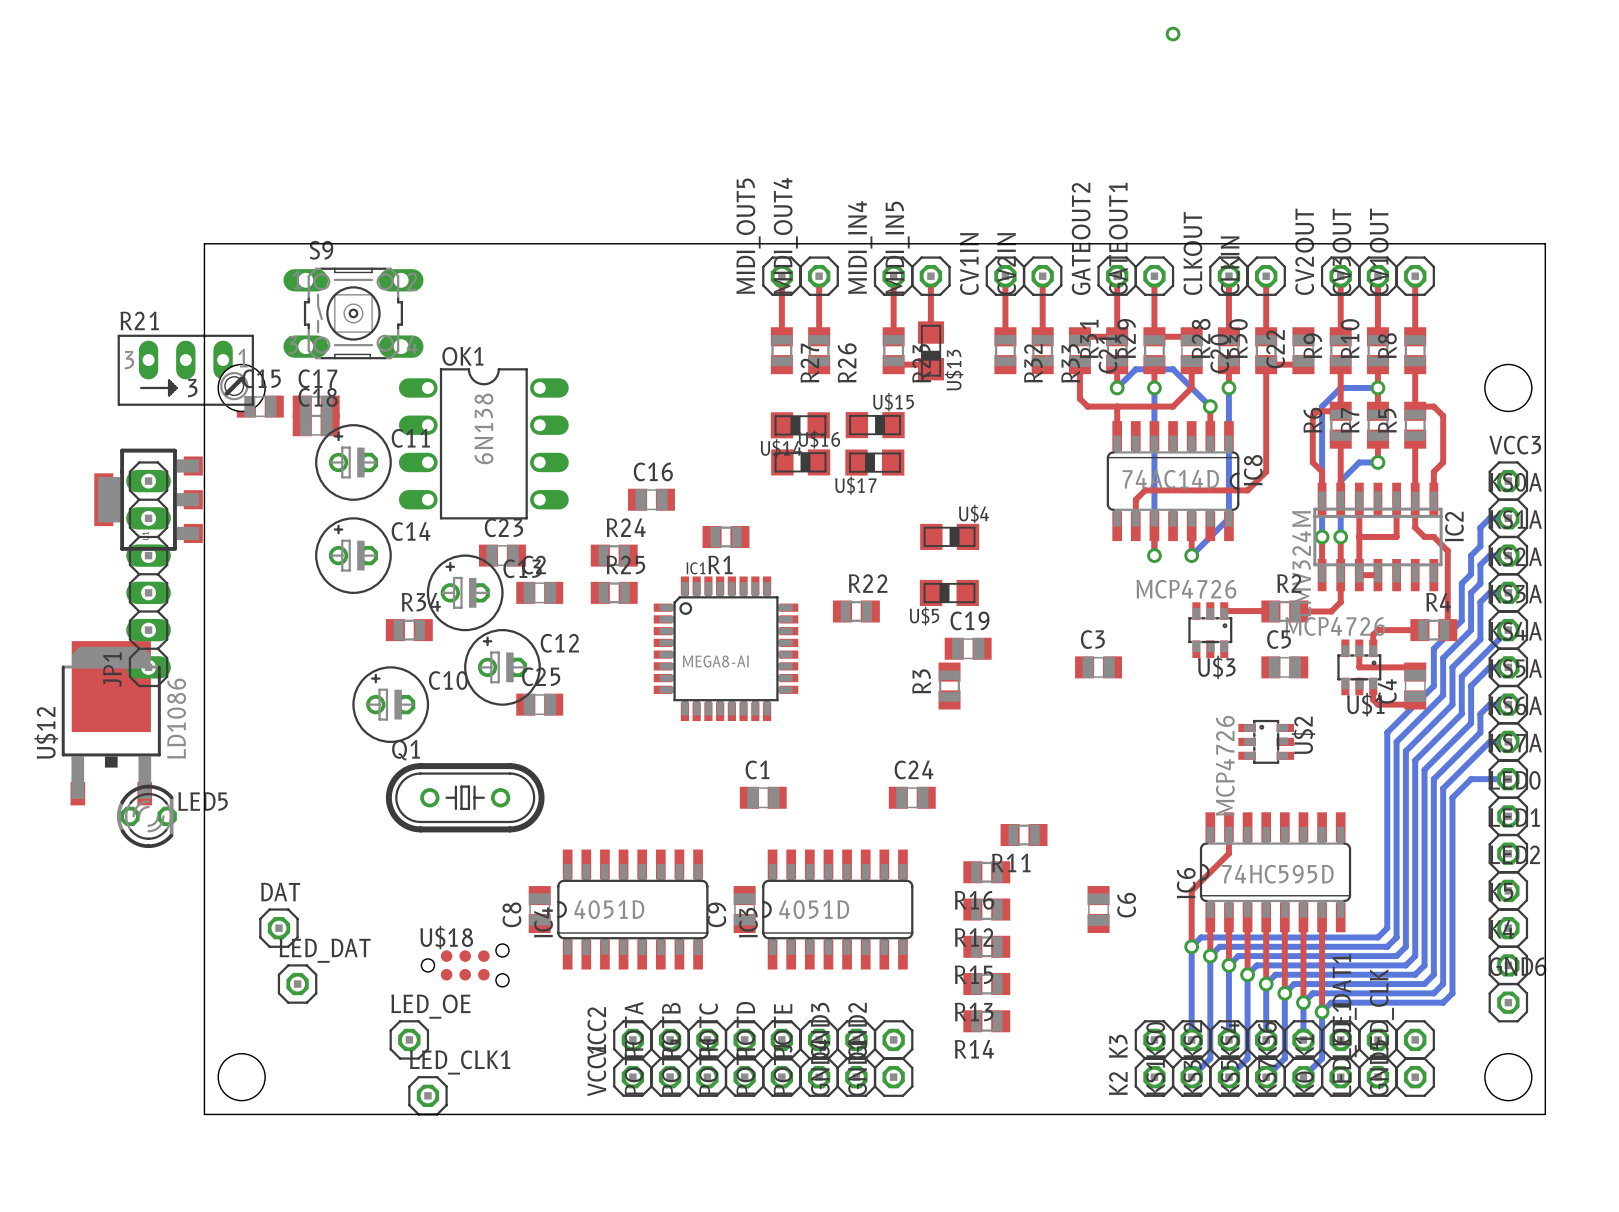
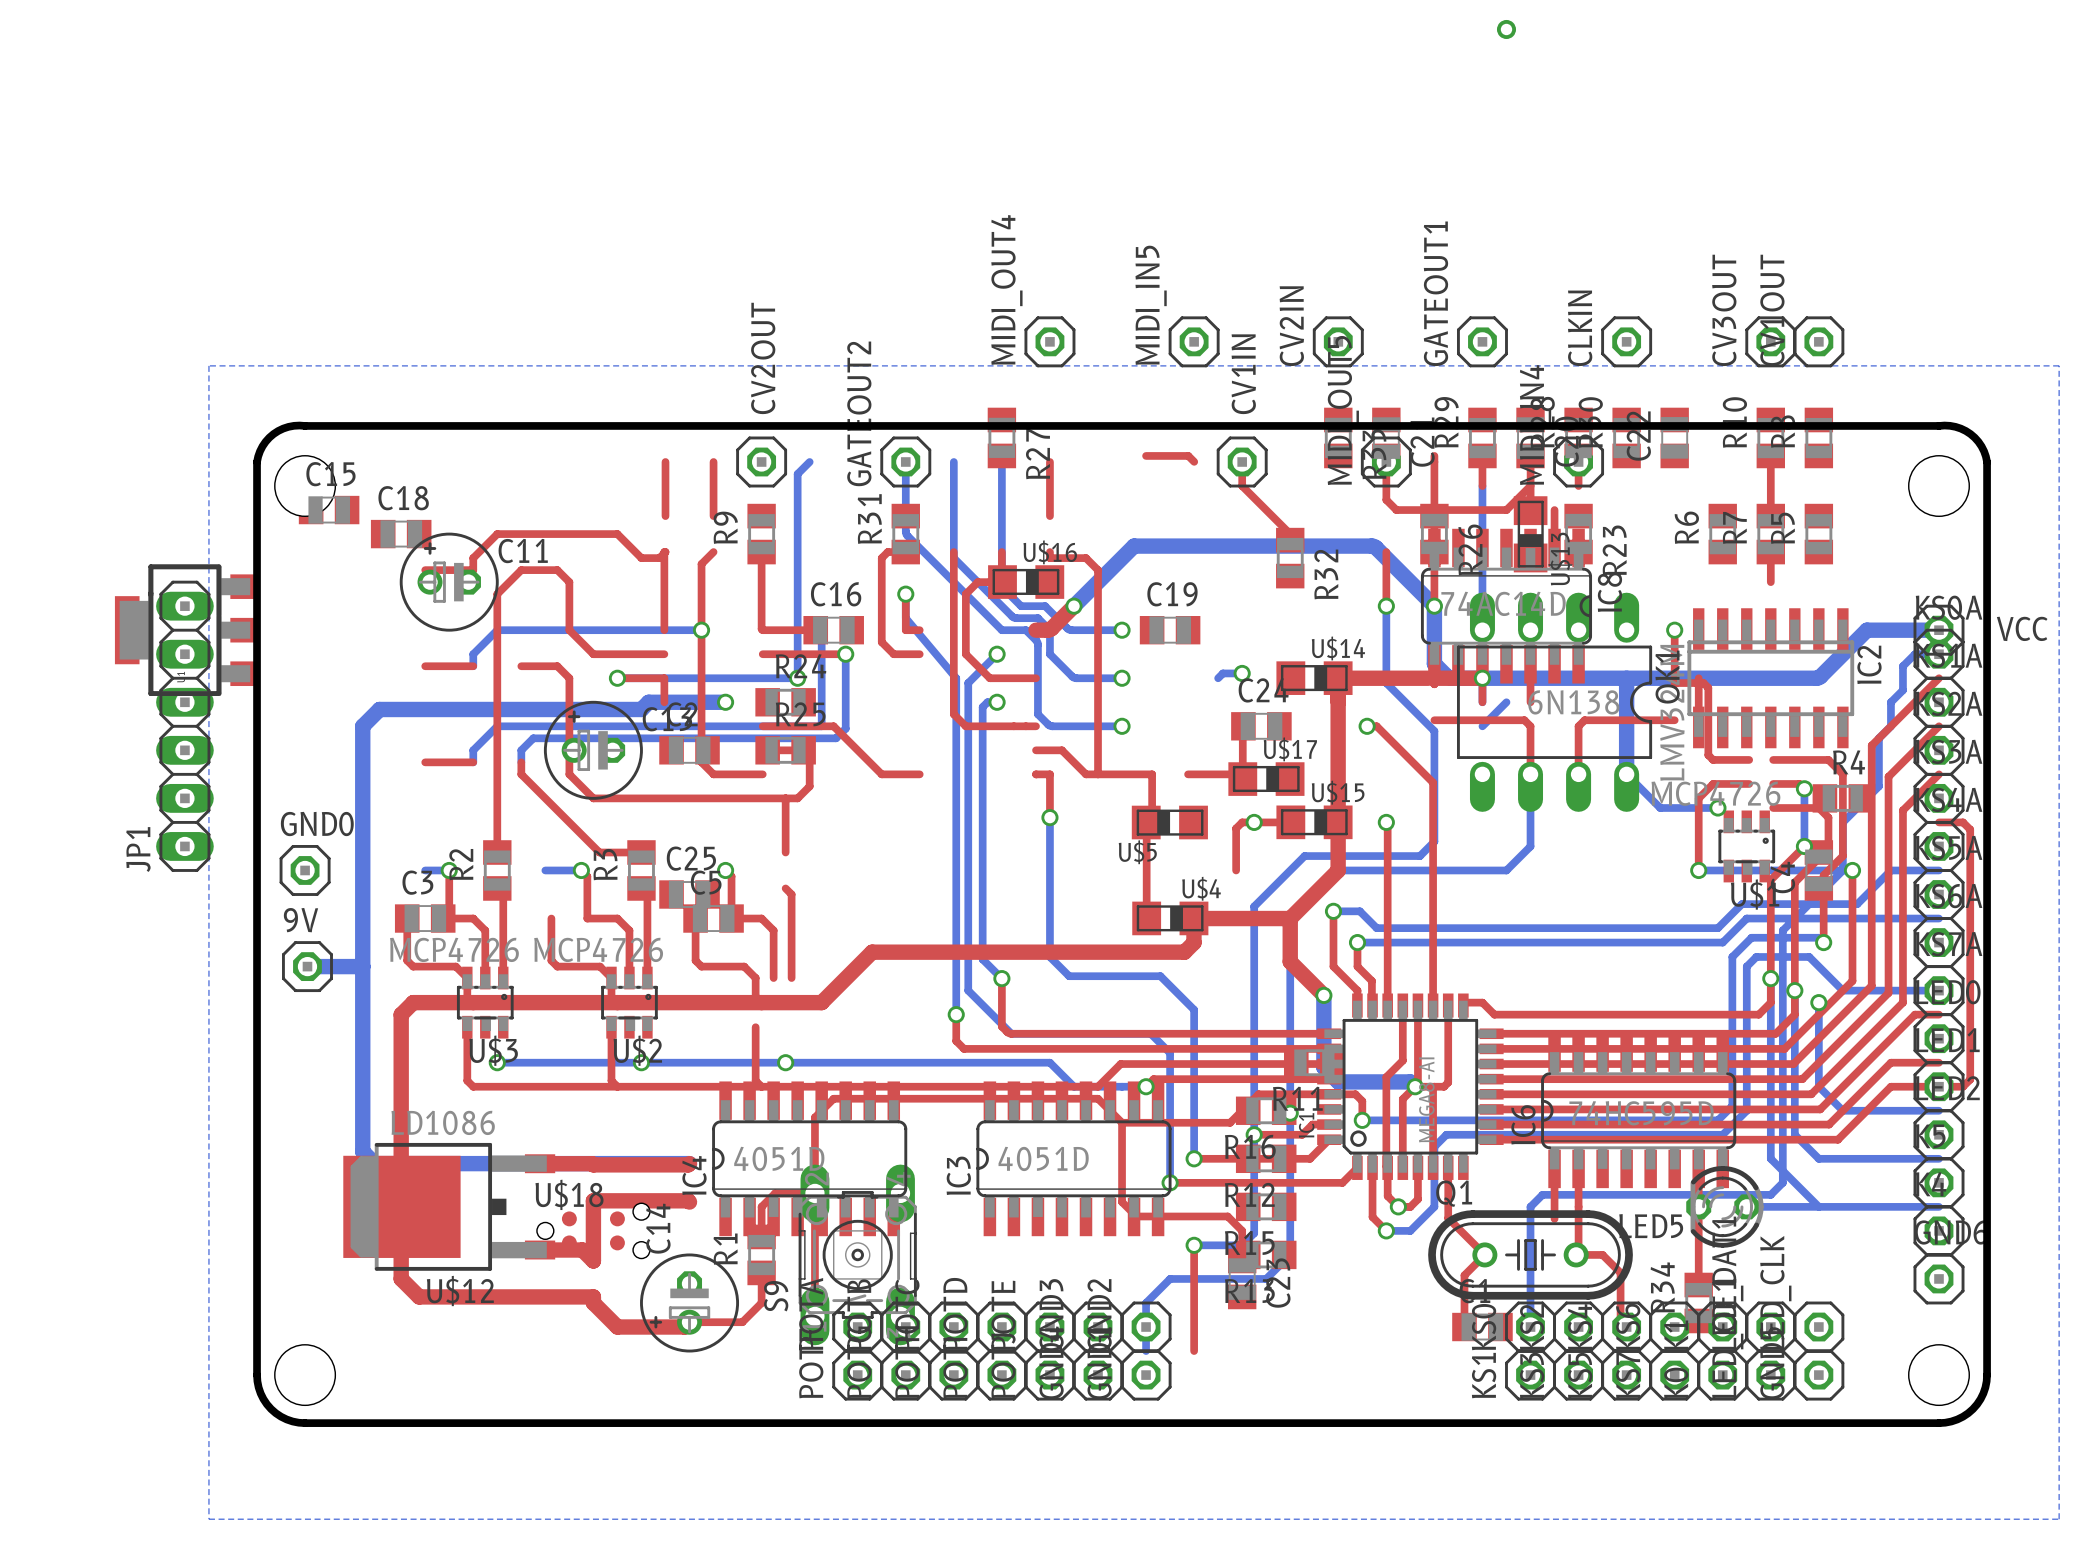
CV2OUT name position: CV2OUT (1304, 251) -> CV2OUT (763, 358)
CV1IN name position: CV1IN (969, 264) -> CV1IN (1243, 374)
top track: (781, 276) (781, 336) -> none
MIDI_OUT5 position: (781, 276) -> (1386, 461)
top track: (819, 276) (819, 336) -> none
top track: (893, 276) (893, 336) -> none
MIDI_IN4 position: (893, 276) -> (1578, 461)
top track: (930, 276) (930, 332) -> none
top track: (1005, 276) (1005, 336) -> none
CV1IN position: (1005, 276) -> (1242, 461)
top track: (1042, 276) (1042, 336) -> none
top track: (1117, 276) (1117, 336) (1079, 336) -> none
GATEOUT2 position: (1117, 276) -> (905, 461)
top track: (1154, 276) (1154, 336) (1191, 336) -> none
top track: (1228, 276) (1228, 336) -> none
CLKOUT: (1228, 276) -> none
top track: (1266, 276) (1266, 336) -> none
top track: (1340, 276) (1340, 336) -> none
CV2OUT position: (1340, 276) -> (761, 461)
top track: (1377, 276) (1377, 336) -> none
top track: (1415, 276) (1415, 336) -> none
bottom zone outline: none -> (208, 365) (208, 1519) (2059, 1519) (2059, 365) (208, 365)
S9 rotation: 0° (353, 313) -> 90° counterclockwise (857, 1254)
S9 position: (353, 313) -> (857, 1254)
R26 position: (819, 350) -> (1434, 534)
R23 position: (893, 350) -> (1578, 534)
U$13 position: (930, 350) -> (1530, 534)
R32 position: (1005, 350) -> (1290, 558)
R31 position: (1117, 350) -> (905, 534)
R9 position: (1340, 350) -> (761, 534)
top track: (1303, 364) (1266, 364) (1266, 471) (1247, 490) (1145, 490) (1135, 499) (1135, 526) -> none
top track: (1340, 364) (1340, 411) (1317, 411) (1312, 415) (1312, 462) (1322, 471) (1322, 498) -> none
top track: (1415, 364) (1415, 411) (1419, 406) (1433, 406) (1443, 415) (1443, 462) (1433, 471) (1433, 498) -> none
board edge: (204, 369) (204, 243) (1545, 243) (1545, 1114) (1508, 1114) -> (257, 461) (262, 446) (273, 434) (283, 428) (299, 425) (1944, 425) (1965, 430) (1978, 441) (1987, 461) (1987, 1375) (1983, 1393) (1972, 1409) (1957, 1419) (1939, 1423)
board edge width: thin (204, 369) (204, 1077) -> thick (257, 461) (257, 1375)
top track: none -> (665, 461) (665, 516)
top track: none -> (713, 461) (713, 516)
bottom track: none -> (809, 461) (797, 474) (797, 678) (617, 678)
bottom track: none -> (905, 461) (906, 534) (1001, 630) (1025, 630) (1036, 641) (1037, 714) (1051, 726) (1122, 726)
bottom track: none -> (953, 461) (953, 558) (1012, 616) (1037, 618) (1049, 631) (1049, 654) (1072, 677) (1122, 678)
bottom track: none -> (1001, 461) (1001, 586) (1021, 606) (1045, 606) (1069, 629) (1122, 630)
top track: none -> (1049, 461) (1049, 516)
top track: none -> (1242, 461) (1242, 486) (1290, 534) (1290, 540)
R21: (185, 370) -> none
top track: none -> (1434, 486) (1434, 510)
bottom track: (1117, 387) (1135, 369) (1173, 369) (1210, 406) -> none
via: (1117, 387) -> none
via: (1154, 387) -> none
bottom track: (1228, 387) (1228, 518) (1191, 555) -> none
via: (1228, 387) -> none
bottom track: (1377, 387) (1340, 387) (1322, 406) (1322, 536) -> none
via: (1377, 387) -> none
C17: (316, 406) -> none
via: (1210, 406) -> none
U$14 rotation: 0° (800, 425) -> 180° (1314, 678)
U$14 position: (800, 425) -> (1314, 678)
U$15 position: (875, 425) -> (1314, 822)
top track: none -> (713, 552) (701, 564) (701, 762) (713, 774) (762, 774)
top track: none -> (761, 552) (761, 629) (821, 630)
top track: none -> (905, 552) (887, 552) (881, 558) (881, 642) (893, 654) (919, 654)
top track: none -> (953, 552) (953, 714) (965, 726) (1036, 726)
top track: none -> (1001, 552) (1001, 570) (989, 582) (977, 582) (965, 594) (965, 654) (989, 678) (1036, 678)
top track: none -> (1049, 552) (1049, 558) (1086, 558) (1098, 570) (1098, 774)
top track: none -> (1386, 552) (1386, 606)
top track: none -> (1434, 552) (1434, 606)
top track: (1340, 439) (1340, 498) -> none
top track: (1415, 439) (1415, 527) (1424, 536) (1433, 536) (1447, 550) (1447, 630) -> none
OK1 rotation: 0° (483, 443) -> 90° clockwise (1554, 702)
OK1 position: (483, 443) -> (1554, 702)
top track: none -> (425, 570) (473, 570) (473, 558) (497, 534) (617, 534) (641, 558) (659, 558) (665, 552) (664, 630)
U$17 rotation: 0° (874, 462) -> 180° (1266, 779)
U$17 position: (874, 462) -> (1266, 779)
bottom track: (1377, 462) (1359, 462) (1340, 481) (1340, 536) -> none
via: (1377, 462) -> none
top track: none -> (905, 594) (905, 630) (919, 630)
bottom track: none -> (905, 594) (905, 618) (956, 678) (956, 1014)
via: none -> (905, 594)
top track: none -> (1073, 606) (1050, 629) (1036, 630)
bottom track: none -> (1073, 606) (1134, 546) (1371, 546) (1376, 547) (1434, 606) (1434, 663) (1450, 678) (1817, 678) (1866, 630) (1939, 630)
via: none -> (1073, 606)
bottom track: none -> (1386, 606) (1386, 683) (1434, 731) (1434, 841) (1419, 856) (1304, 856) (1254, 906) (1254, 1233) (1242, 1245) (1194, 1245)
via: none -> (1386, 606)
via: none -> (1434, 606)
VCC3: (1508, 481) -> none
top track: (1359, 498) (1359, 575) (1377, 575) -> none
top track: (1396, 498) (1396, 536) (1359, 536) -> none
bottom track: none -> (701, 630) (497, 630) (473, 654) (473, 666)
via: none -> (701, 630)
bottom track: none -> (821, 630) (821, 726) (497, 726) (473, 750) (473, 762)
via: none -> (1122, 630)
top track: none -> (1674, 630) (1674, 684) (1703, 683) (1708, 687) (1708, 755) (1713, 759) (1749, 759)
via: none -> (1674, 630)
VCC: none -> (1939, 630)
top track: none -> (664, 654) (593, 654) (569, 630) (569, 582) (557, 570) (521, 570) (497, 594) (497, 852)
top track: none -> (762, 654) (845, 654)
bottom track: none -> (845, 654) (845, 728) (836, 738) (533, 738) (521, 750) (521, 762)
via: none -> (845, 654)
bottom track: none -> (997, 654) (968, 683) (968, 990) (1011, 1033) (1150, 1033) (1170, 1053) (1170, 1182)
via: none -> (997, 654)
top track: none -> (425, 666) (473, 666)
top track: none -> (521, 666) (557, 666) (569, 678) (569, 774) (593, 798) (797, 798) (809, 786) (809, 750) (762, 750)
bottom track: none -> (1242, 673) (1222, 673) (1218, 678)
via: none -> (1242, 673)
top track: none -> (617, 678) (664, 678) (664, 702)
via: none -> (617, 678)
via: none -> (797, 678)
R1 rotation: 0° (726, 536) -> 90° clockwise (761, 1254)
R1 position: (726, 536) -> (761, 1254)
via: none -> (1122, 678)
U$4 position: (949, 536) -> (1170, 918)
top track: none -> (1482, 678) (1434, 678) (1434, 684) (1428, 678) (1343, 678) (1338, 683) (1338, 702) (1338, 678) (1338, 870) (1290, 918)
via: none -> (1482, 678)
bottom track: none -> (1626, 678) (1626, 774) (1660, 808) (1717, 808)
via: (1322, 536) -> none
top track: (1340, 536) (1340, 602) (1331, 611) (1298, 611) -> none
via: (1340, 536) -> none
top track: none -> (1939, 678) (1871, 745) (1871, 985) (1793, 1064) (1491, 1064)
C14 rotation: 0° (353, 555) -> 90° counterclockwise (689, 1302)
C14 position: (353, 555) -> (689, 1302)
C23 rotation: 0° (502, 555) -> 90° clockwise (1242, 1278)
C23 position: (502, 555) -> (1242, 1278)
bottom track: none -> (725, 702) (648, 702) (641, 709) (379, 709) (362, 726) (362, 1151) (374, 1163) (689, 1163)
via: none -> (725, 702)
bottom track: none -> (997, 702) (987, 702) (982, 707) (982, 959) (1001, 978)
via: none -> (997, 702)
via: (1154, 555) -> none
bottom track: none -> (1506, 702) (1482, 726)
via: (1191, 555) -> none
bottom track: (1508, 555) (1489, 555) (1480, 564) (1480, 583) (1471, 592) (1471, 630) (1443, 658) (1443, 695) (1396, 741) (1396, 779) -> none
top track: none -> (1434, 720) (1524, 720) (1530, 726) (1530, 774)
top track: none -> (1674, 720) (1584, 720) (1578, 726) (1578, 774)
top track: none -> (762, 726) (833, 726) (881, 774) (919, 774)
via: none -> (1122, 726)
top track: none -> (1243, 726) (1242, 779) (1242, 774) (1188, 774)
top track: none -> (1367, 726) (1376, 726) (1433, 782) (1433, 1005)
via: none -> (1367, 726)
top track: none -> (1939, 726) (1888, 776) (1888, 993) (1802, 1079) (1491, 1079)
R2 name position: R2 (1289, 583) -> R2 (461, 864)
top track: none -> (1036, 750) (1061, 750) (1086, 774) (1152, 774) (1152, 816) (1146, 822) (1146, 918)
U$5 position: (949, 592) -> (1169, 822)
bottom track: (1508, 592) (1489, 592) (1480, 602) (1480, 639) (1452, 667) (1452, 704) -> (1939, 870) (1890, 870) (1866, 894)
top track: none -> (1773, 759) (1828, 759) (1842, 774) (1842, 856) (1823, 875) (1823, 942)
top track: none -> (425, 762) (473, 762)
top track: none -> (521, 762) (521, 774) (599, 852) (641, 852)
R34 name position: R34 (421, 602) -> R34 (1662, 1287)
top track: none -> (1036, 774) (1049, 774) (1049, 817)
R22: (856, 611) -> none
bottom track: none -> (1530, 774) (1530, 846) (1506, 870) (1338, 870) (1290, 918) (1290, 1254) (1266, 1278) (1170, 1278) (1146, 1302) (1146, 1351)
top track: (1224, 611) (1270, 611) -> none
R2 rotation: 0° (1284, 611) -> 90° clockwise (497, 870)
R2 position: (1284, 611) -> (497, 870)
top track: none -> (1939, 774) (1902, 810) (1902, 1002) (1811, 1094) (1491, 1094)
top track: none -> (1749, 783) (1713, 783) (1698, 798) (1698, 870)
top track: none -> (1773, 783) (1799, 783) (1804, 788)
bottom track: none -> (1804, 788) (1804, 846)
via: none -> (1804, 788)
R34 rotation: 0° (409, 630) -> 90° clockwise (1698, 1302)
R34 position: (409, 630) -> (1698, 1302)
top track: none -> (785, 798) (785, 852)
U$3 position: (1210, 630) -> (485, 1002)
top track: (1419, 630) (1377, 630) (1373, 634) (1373, 648) -> none
bottom track: (1508, 630) (1461, 676) (1461, 713) (1415, 760) (1415, 788) -> none
via: none -> (1717, 808)
top track: none -> (1773, 808) (1818, 808) (1828, 817) (1828, 848) (1794, 882) (1794, 1014) (1775, 1033) (1491, 1033)
bottom track: none -> (1049, 817) (1049, 956) (1069, 976) (1160, 976) (1194, 1009) (1194, 1158)
via: none -> (1049, 817)
IC1 rotation: 0° (726, 648) -> 90° counterclockwise (1410, 1086)
IC1 position: (726, 648) -> (1410, 1086)
C19 position: (968, 648) -> (1170, 630)
via: none -> (1254, 822)
top track: none -> (1290, 822) (1242, 822) (1236, 828) (1236, 870)
top track: none -> (1386, 822) (1387, 1005)
via: none -> (1386, 822)
top track: (1359, 648) (1359, 667) (1410, 667) (1415, 672) -> none
top track: none -> (1939, 822) (1963, 822) (1970, 829) (1970, 1079) (1963, 1086) (1890, 1086) (1837, 1139) (1491, 1139)
C12: (502, 667) -> none
C3 position: (1098, 667) -> (425, 918)
C5 position: (1284, 667) -> (713, 918)
top track: none -> (1804, 846) (1770, 880) (1770, 1002) (1758, 1014) (1494, 1014) (1482, 1002) (1466, 1002) (1463, 1005)
via: none -> (1804, 846)
bottom track: (1508, 667) (1489, 667) (1471, 686) (1471, 723) (1424, 769) (1424, 965) (1415, 974) (1275, 974) (1266, 984) (1266, 1039) -> none
GND0: none -> (305, 870)
bottom track: none -> (425, 870) (449, 870)
top track: none -> (449, 870) (449, 918)
via: none -> (449, 870)
bottom track: none -> (545, 870) (581, 870)
top track: none -> (581, 870) (587, 876) (587, 918) (617, 918) (629, 930) (629, 978)
via: none -> (581, 870)
top track: none -> (725, 870) (731, 876) (731, 918) (761, 918) (773, 930) (773, 978)
via: none -> (725, 870)
R3 position: (949, 686) -> (641, 870)
bottom track: none -> (1698, 870) (1852, 870)
via: none -> (1698, 870)
top track: (1373, 686) (1373, 699) (1377, 704) (1415, 704) (1415, 699) -> none
top track: none -> (1852, 870) (1852, 981) (1784, 1048) (1491, 1048)
via: none -> (1852, 870)
top track: none -> (497, 888) (503, 894) (503, 978)
top track: none -> (641, 888) (647, 894) (647, 978)
top track: none -> (785, 888) (791, 894) (791, 978)
C10: (390, 704) -> none
bottom track: (1508, 704) (1489, 704) (1480, 713) (1480, 732) (1433, 779) (1433, 974) (1424, 984) (1294, 984) (1284, 993) (1284, 1058) (1266, 1077) -> none
bottom track: (1445, 712) (1405, 751) (1405, 946) (1396, 956) (1238, 956) (1228, 965) (1228, 1039) -> (1857, 904) (1741, 904) (1717, 928) (1376, 928) (1359, 911) (1333, 911)
top track: none -> (1333, 911) (1333, 966) (1357, 990) (1357, 1005)
via: none -> (1333, 911)
U$12 rotation: 0° (111, 723) -> 90° counterclockwise (449, 1206)
U$12 position: (111, 723) -> (449, 1206)
top track: none -> (407, 918) (407, 960) (413, 966) (455, 966) (467, 978) (467, 996) (473, 1002)
top track: none -> (443, 918) (473, 918) (485, 930) (485, 978)
top track: none -> (551, 918) (551, 960) (557, 966) (600, 966) (611, 978) (611, 996) (617, 1002)
top track: none -> (695, 918) (695, 960) (701, 966) (744, 966) (755, 978) (755, 996) (761, 1002)
top track: none -> (1193, 918) (1193, 942) (1184, 952) (872, 952) (821, 1002) (413, 1002) (401, 1014) (401, 1278) (419, 1296) (593, 1296) (593, 1302) (617, 1327) (684, 1327) (689, 1322) (742, 1322) (761, 1302) (761, 1272)
top track: none -> (1194, 918) (1290, 918)
top track: none -> (1290, 918) (1290, 961) (1323, 995)
bottom track: none -> (1939, 918) (1746, 918) (1722, 942) (1357, 942)
top track: none -> (1357, 942) (1357, 966) (1371, 981) (1372, 1005)
via: none -> (1357, 942)
U$2 rotation: 0° (1266, 741) -> 90° clockwise (629, 1002)
U$2 position: (1266, 741) -> (629, 1002)
bottom track: none -> (1823, 942) (1818, 937) (1751, 937) (1732, 956) (1732, 1105) (1717, 1120) (1362, 1120)
via: none -> (1823, 942)
bottom track: (1508, 741) (1489, 741) (1443, 788) (1443, 984) (1433, 993) (1312, 993) (1303, 1002) (1303, 1039) -> none
bottom track: none -> (307, 966) (362, 966)
9V: none -> (307, 966)
top track: none -> (1001, 978) (1001, 1026) (1010, 1033) (1329, 1033)
via: none -> (1001, 978)
bottom track: none -> (1770, 978) (1770, 1158) (1818, 1206)
via: none -> (1770, 978)
via: none -> (1794, 990)
bottom track: (1471, 779) (1452, 797) (1452, 993) (1443, 1002) (1331, 1002) (1322, 1011) (1322, 1058) (1303, 1077) -> (1890, 990) (1842, 990) (1809, 956) (1756, 956) (1746, 966) (1746, 1110) (1722, 1134) (1446, 1134) (1434, 1146) (1434, 1206) (1410, 1230) (1386, 1230)
bottom track: none -> (1323, 995) (1323, 1067) (1338, 1081) (1410, 1081) (1415, 1086)
via: none -> (1323, 995)
via: none -> (1818, 1002)
top track: none -> (1402, 1005) (1402, 1060) (1386, 1077) (1387, 1196) (1398, 1206) (1410, 1206) (1417, 1199) (1417, 1167)
top track: none -> (1417, 1005) (1417, 1083) (1402, 1099) (1402, 1167)
top track: none -> (1448, 1005) (1448, 1082) (1444, 1086) (1415, 1086)
Q1 position: (465, 797) -> (1530, 1254)
top track: none -> (956, 1014) (956, 1041) (964, 1048) (1329, 1048)
via: none -> (956, 1014)
C1 position: (763, 797) -> (1482, 1327)
C24 position: (912, 797) -> (1261, 726)
top track: none -> (1939, 1014) (1914, 1014) (1820, 1109) (1491, 1109)
top track: none -> (467, 1027) (467, 1080) (473, 1086) (1098, 1086) (1120, 1064) (1329, 1064)
top track: none -> (611, 1027) (611, 1080) (617, 1086)
top track: none -> (755, 1027) (755, 1080) (761, 1086)
LED5 rotation: 0° (146, 816) -> 180° (1724, 1206)
LED5 position: (146, 816) -> (1724, 1206)
top track: (1228, 827) (1228, 853) (1191, 890) (1191, 946) -> none
bottom track: none -> (497, 1062) (1049, 1062) (1073, 1086) (1146, 1086)
via: none -> (497, 1062)
via: none -> (641, 1062)
via: none -> (785, 1062)
top track: none -> (1939, 1062) (1890, 1062) (1829, 1124) (1491, 1124)
top track: none -> (1329, 1079) (1153, 1079) (1146, 1086)
via: none -> (1146, 1086)
via: none -> (1415, 1086)
top track: none -> (1434, 1086) (1433, 1167)
bottom track: (1415, 853) (1415, 956) (1405, 965) (1256, 965) (1247, 974) (1247, 1058) (1228, 1077) -> (1818, 1086) (1842, 1110) (1939, 1110)
via: none -> (1290, 1113)
top track: none -> (1362, 1120) (1362, 1101) (1355, 1094) (1258, 1094) (1230, 1122) (1122, 1122)
via: none -> (1362, 1120)
top track: none -> (1122, 1122) (1098, 1098) (833, 1098) (814, 1117) (814, 1316)
top track: none -> (1122, 1122) (1122, 1202) (1136, 1216) (1227, 1216) (1242, 1230) (1242, 1260)
top track: none -> (1329, 1124) (1312, 1124) (1302, 1134) (1254, 1134)
via: none -> (1254, 1134)
bottom track: (1396, 890) (1396, 937) (1387, 946) -> (1939, 1206) (1782, 1206)
bottom track: none -> (1794, 1134) (1818, 1158) (1939, 1158)
top track: none -> (1329, 1139) (1310, 1158) (1194, 1158)
C8: (539, 909) -> none
C9: (744, 909) -> none
via: none -> (1194, 1158)
C6: (1098, 909) -> none
top track: none -> (689, 1163) (540, 1163)
top track: none -> (1357, 1167) (1342, 1182) (1170, 1182)
top track: none -> (1372, 1167) (1372, 1217) (1386, 1230)
top track: none -> (1448, 1167) (1448, 1218) (1484, 1254) (1464, 1275) (1464, 1327)
top track: (1247, 917) (1247, 974) -> none
top track: (1266, 917) (1266, 984) -> none
top track: (1284, 917) (1284, 993) -> none
top track: (1303, 917) (1303, 1002) -> none
DAT: (278, 928) -> none
via: none -> (1170, 1182)
top track: none -> (814, 1193) (775, 1193) (761, 1206) (761, 1236)
top track: none -> (689, 1202) (593, 1200) (593, 1260) (582, 1250) (540, 1250)
via: none -> (1398, 1206)
via: (1191, 946) -> none
bottom track: (1359, 946) (1219, 946) (1210, 956) (1210, 1058) (1191, 1077) -> none
via: (1210, 956) -> none
via: none -> (1386, 1230)
top track: none -> (1578, 1230) (1578, 1252) (1576, 1254) (1602, 1254) (1620, 1272) (1620, 1327)
via: (1228, 965) -> none
via: (1247, 974) -> none
top track: none -> (1194, 1245) (1194, 1351)
via: none -> (1194, 1245)
LED_DAT: (297, 984) -> none
via: (1266, 984) -> none
via: (1284, 993) -> none
via: (1303, 1002) -> none
via: (1322, 1011) -> none
R14: (986, 1021) -> none
LED_OE: (409, 1039) -> none
VCC2: (632, 1039) -> none
K3: (1154, 1039) -> none
board edge: (204, 1077) (204, 1114) (241, 1114) -> (257, 1375) (260, 1393) (271, 1409) (286, 1419) (305, 1423)
VCC1: (632, 1077) -> none
K2: (1154, 1077) -> none
LED_CLK1: (427, 1095) -> none
board edge width: thin (241, 1114) (1508, 1114) -> thick (305, 1423) (1939, 1423)

